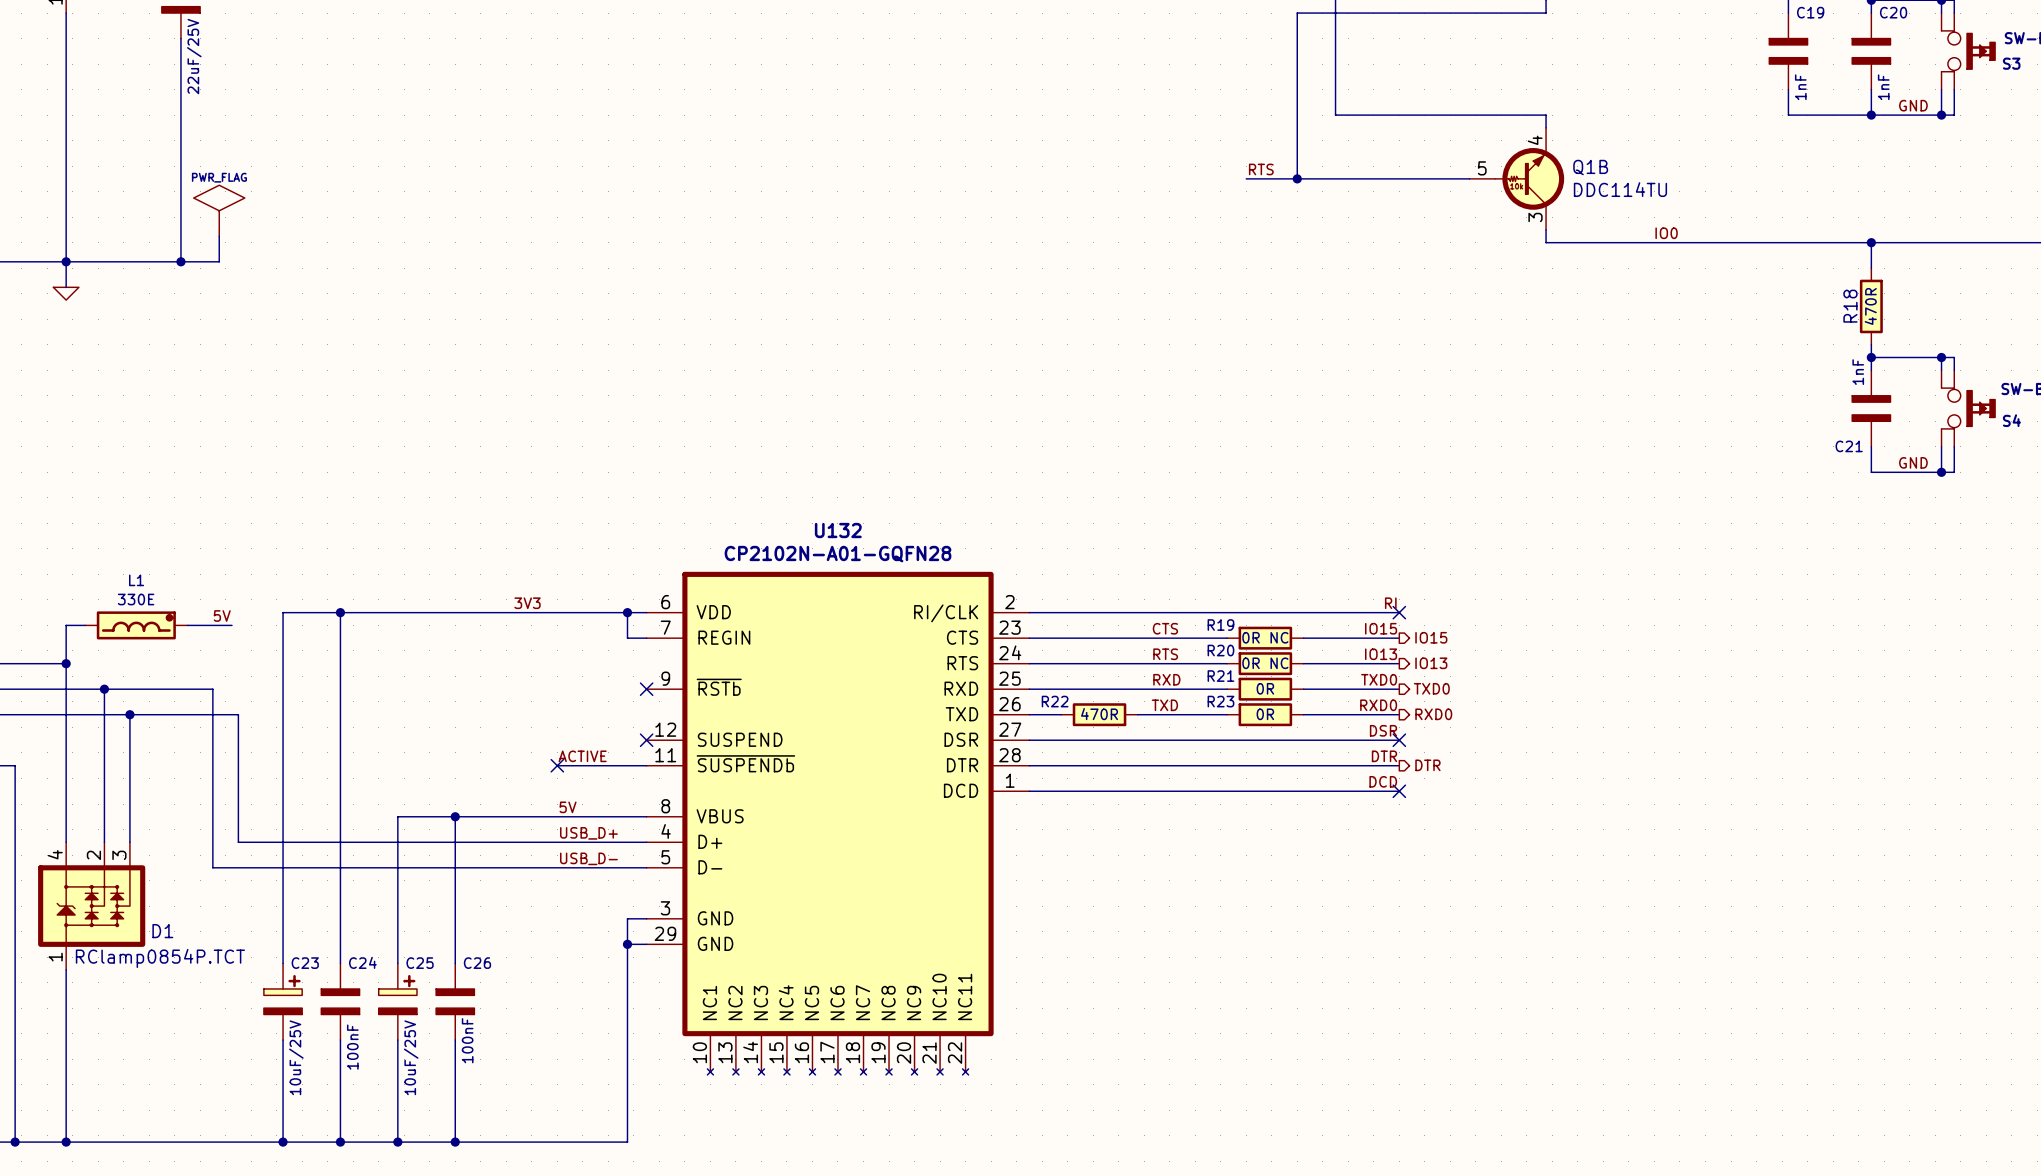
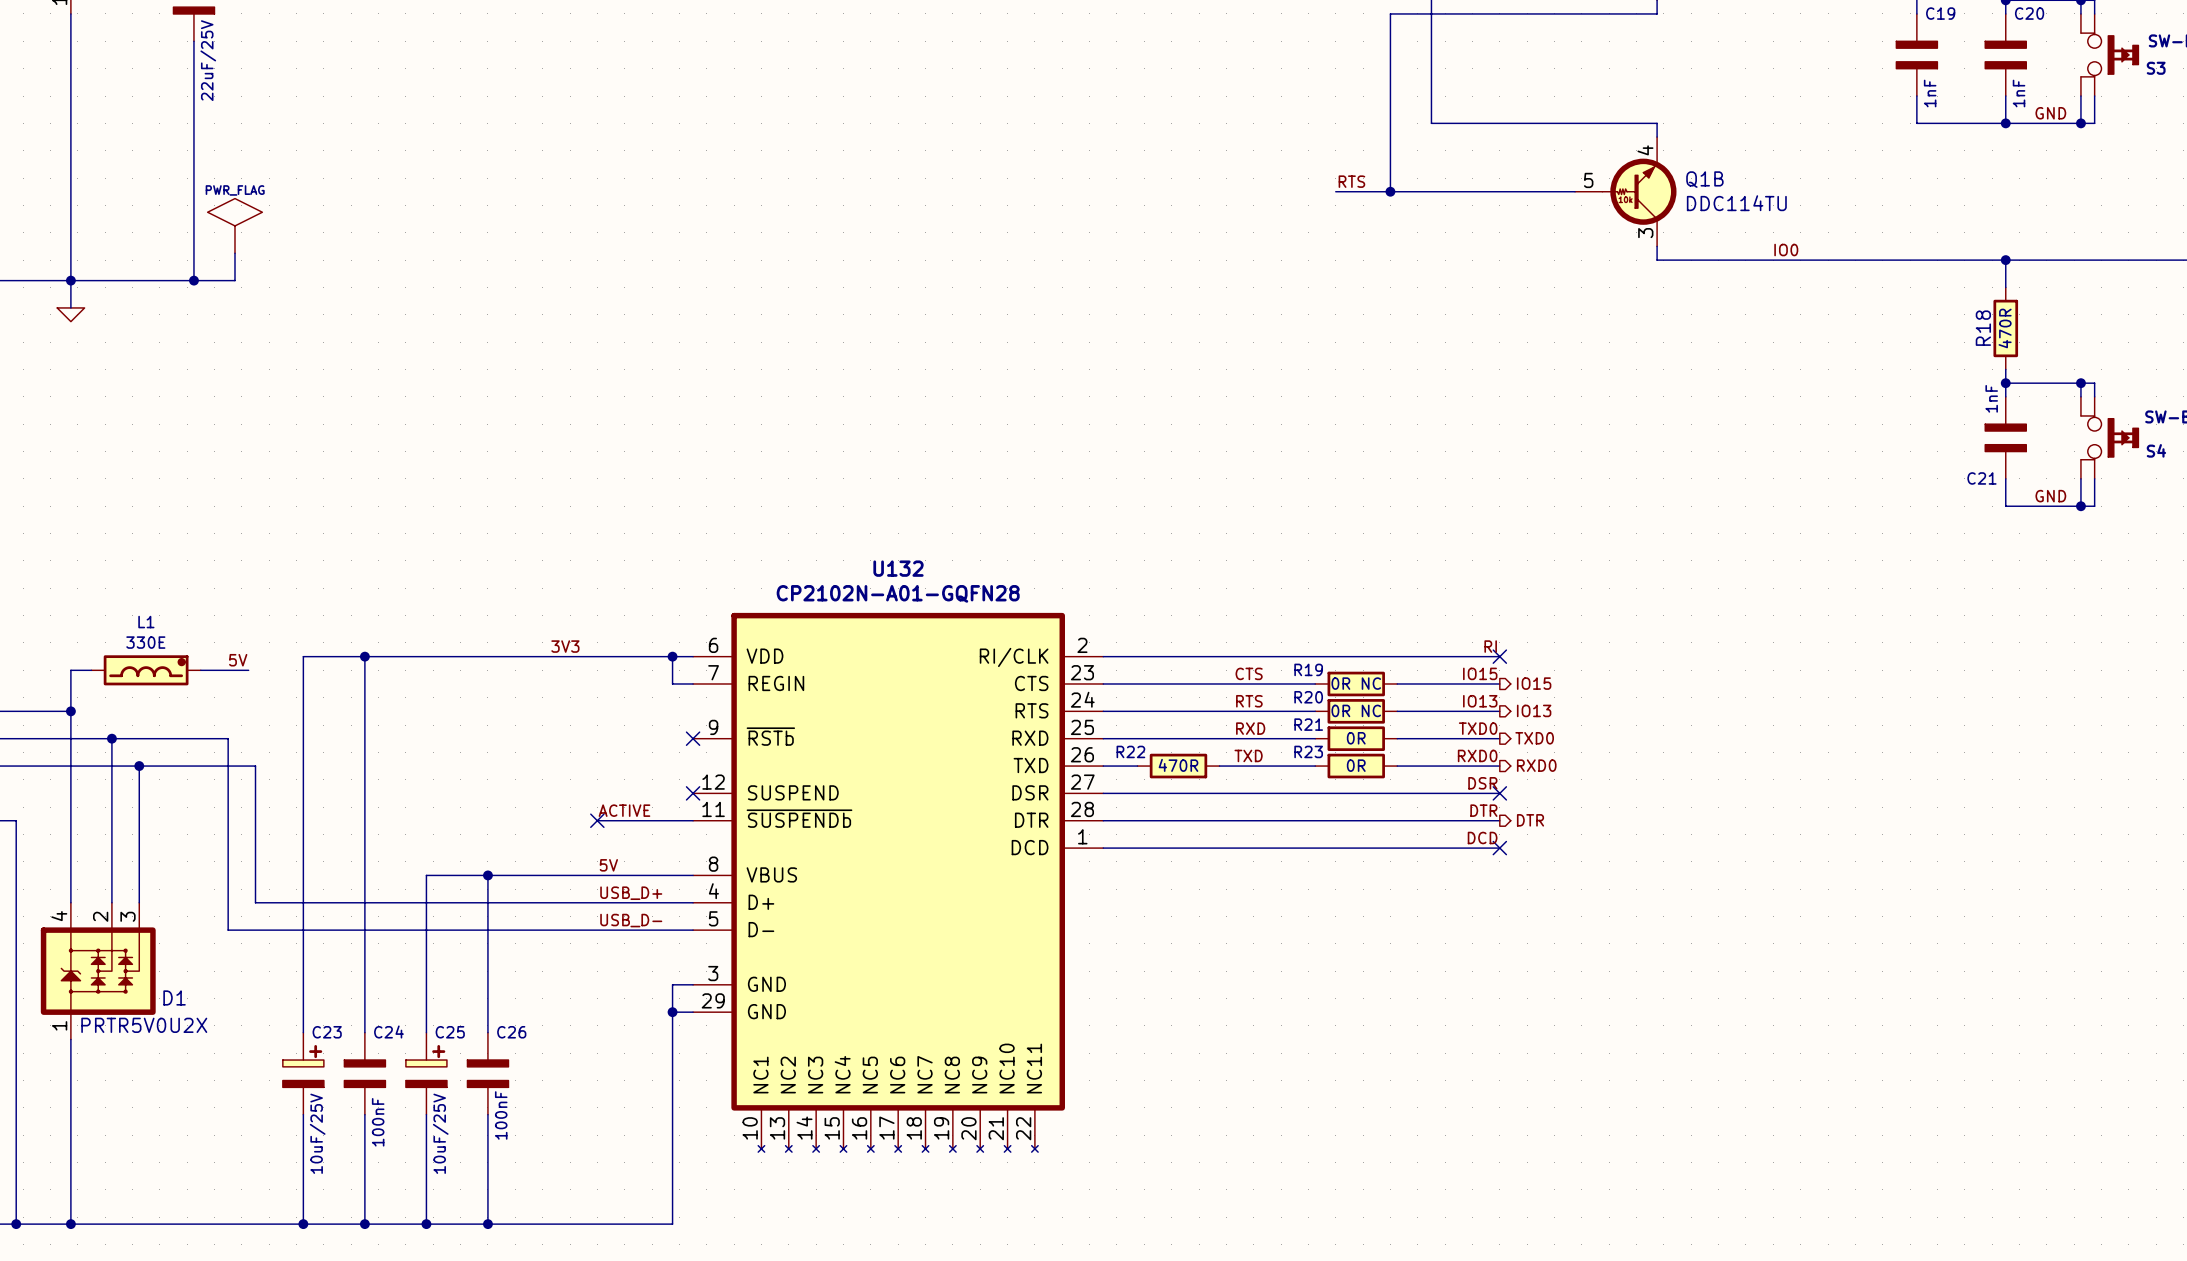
D1 value: RClamp0854P.TCT (160, 958) -> PRTR5V0U2X (144, 1025)

